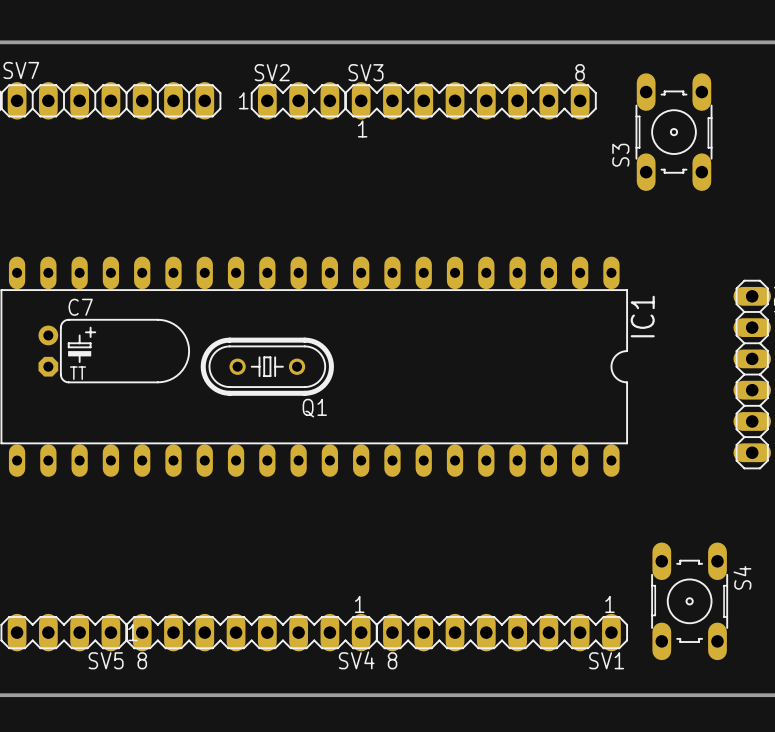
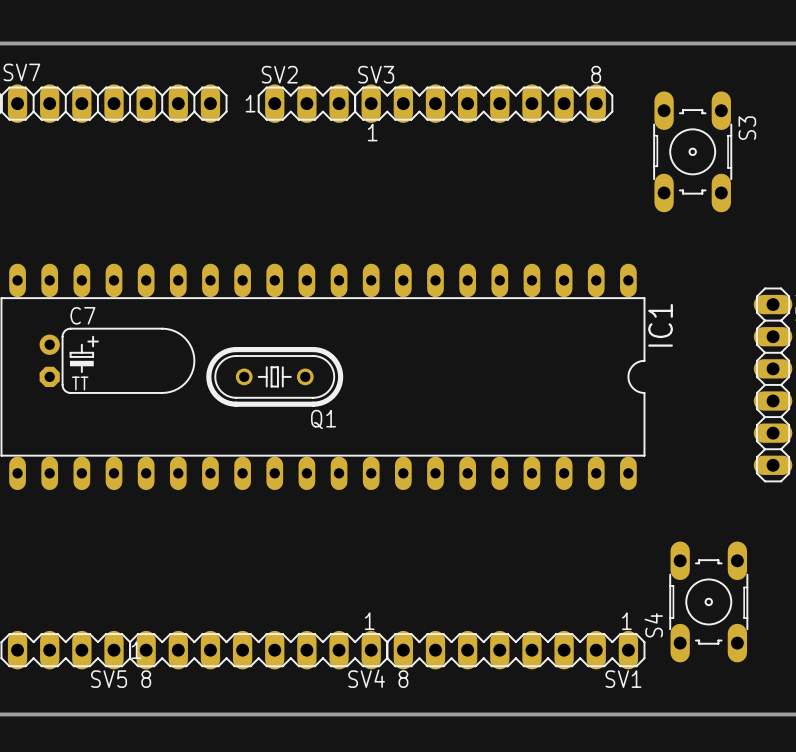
S3 rotation: 0° (674, 132) -> 180° (692, 151)
S4 rotation: 0° (689, 601) -> 180° (708, 601)

